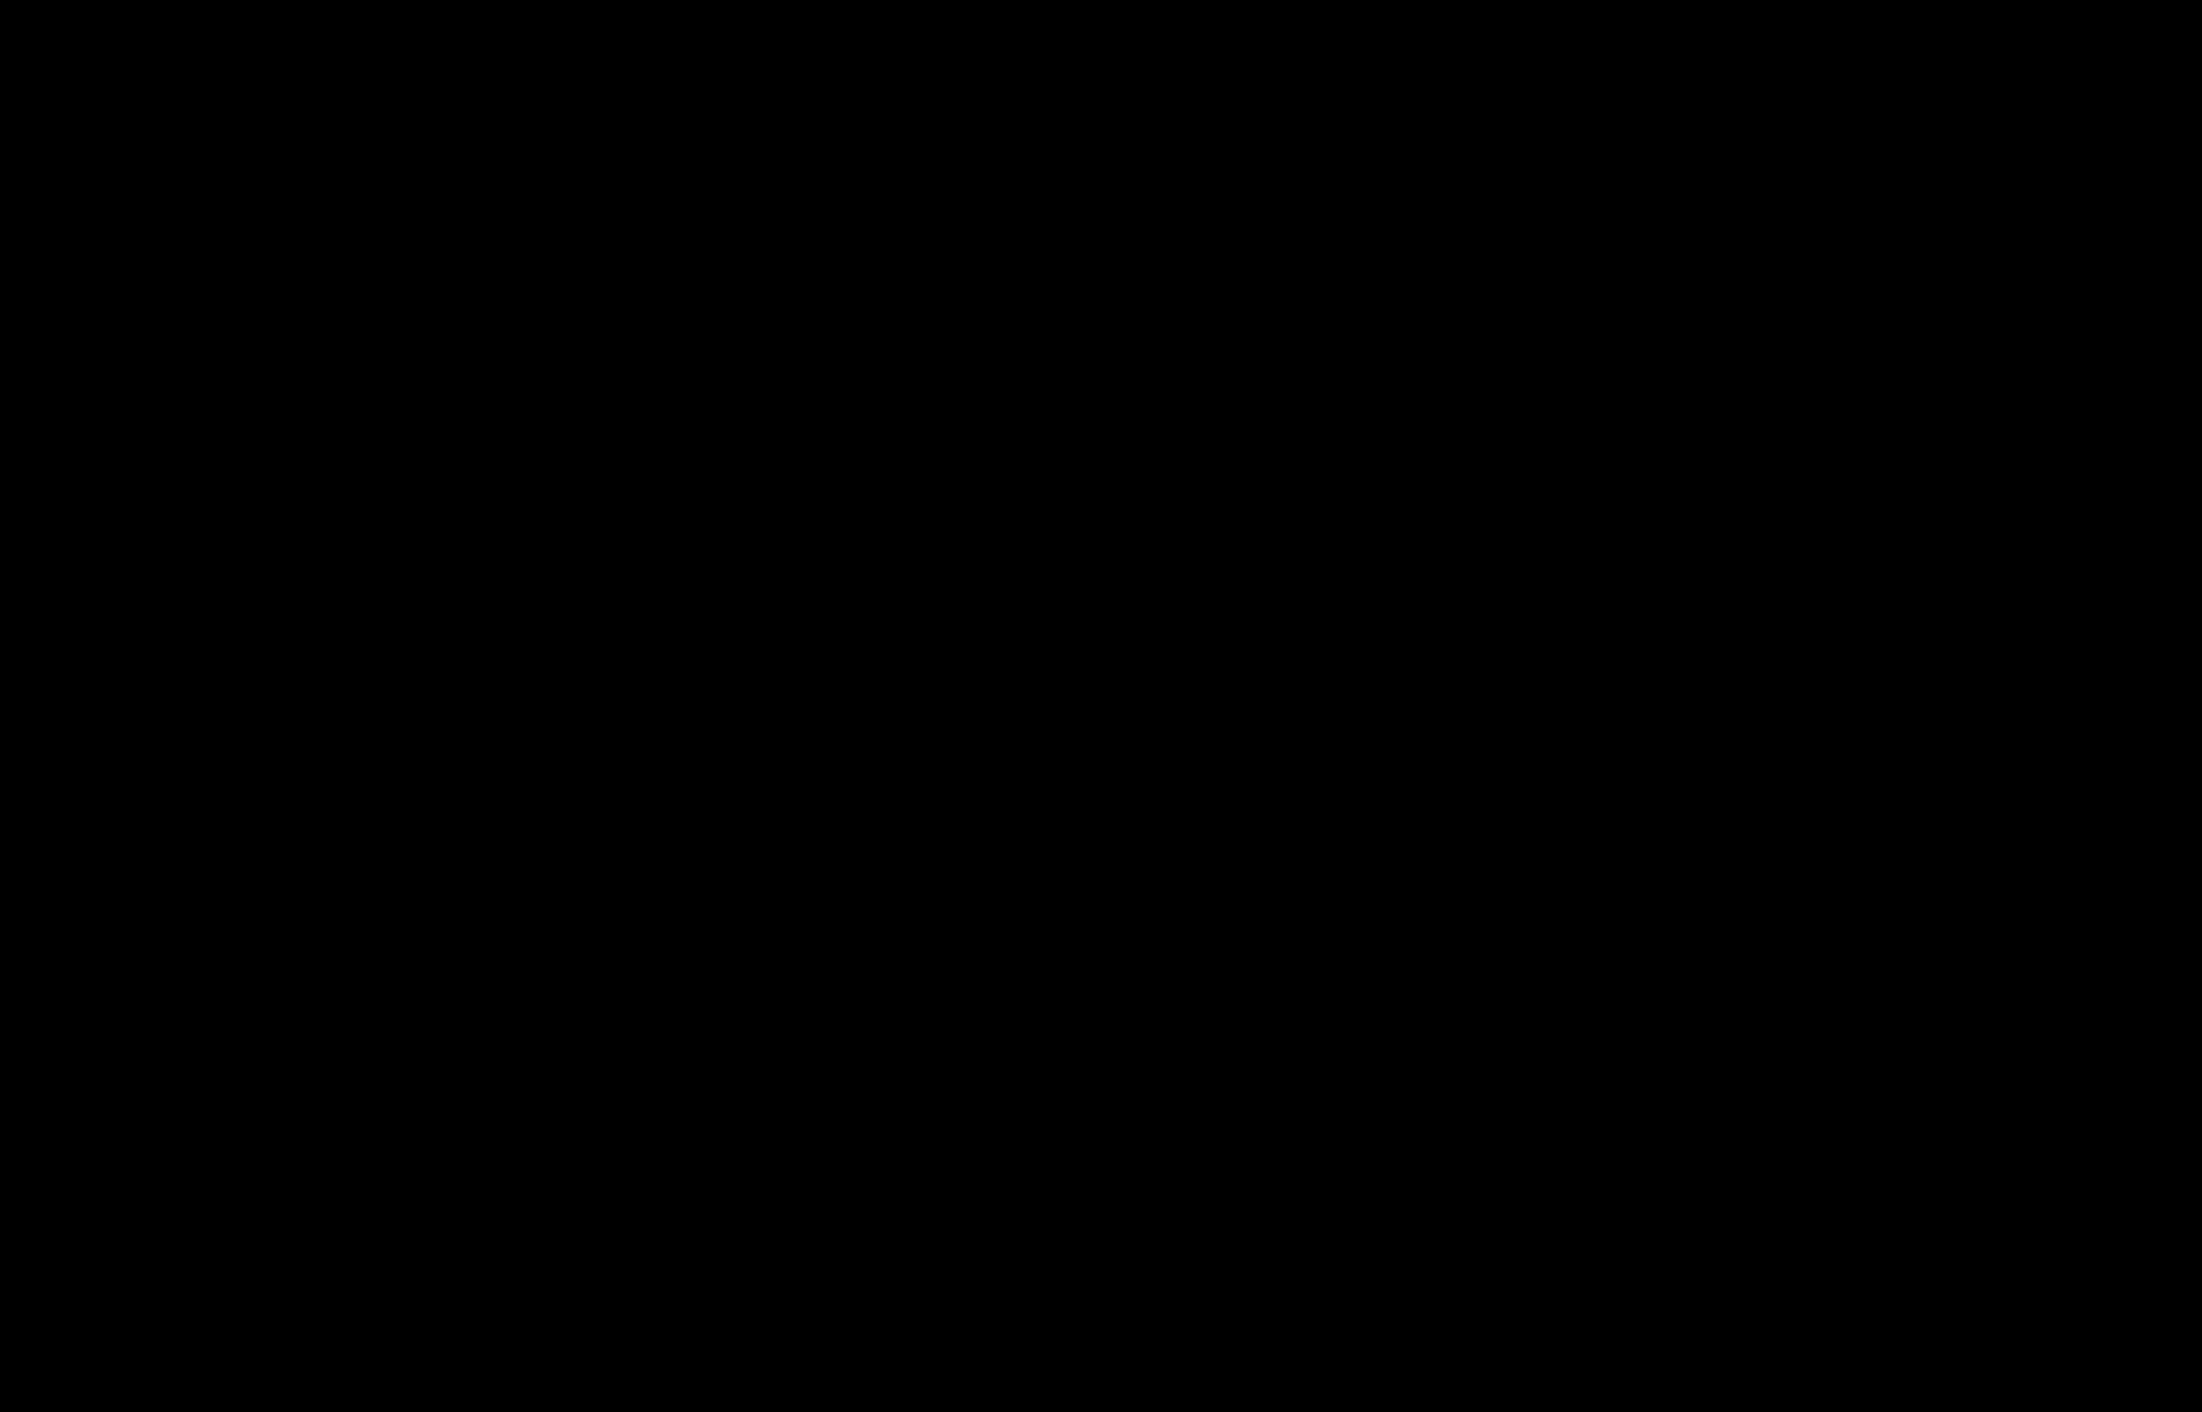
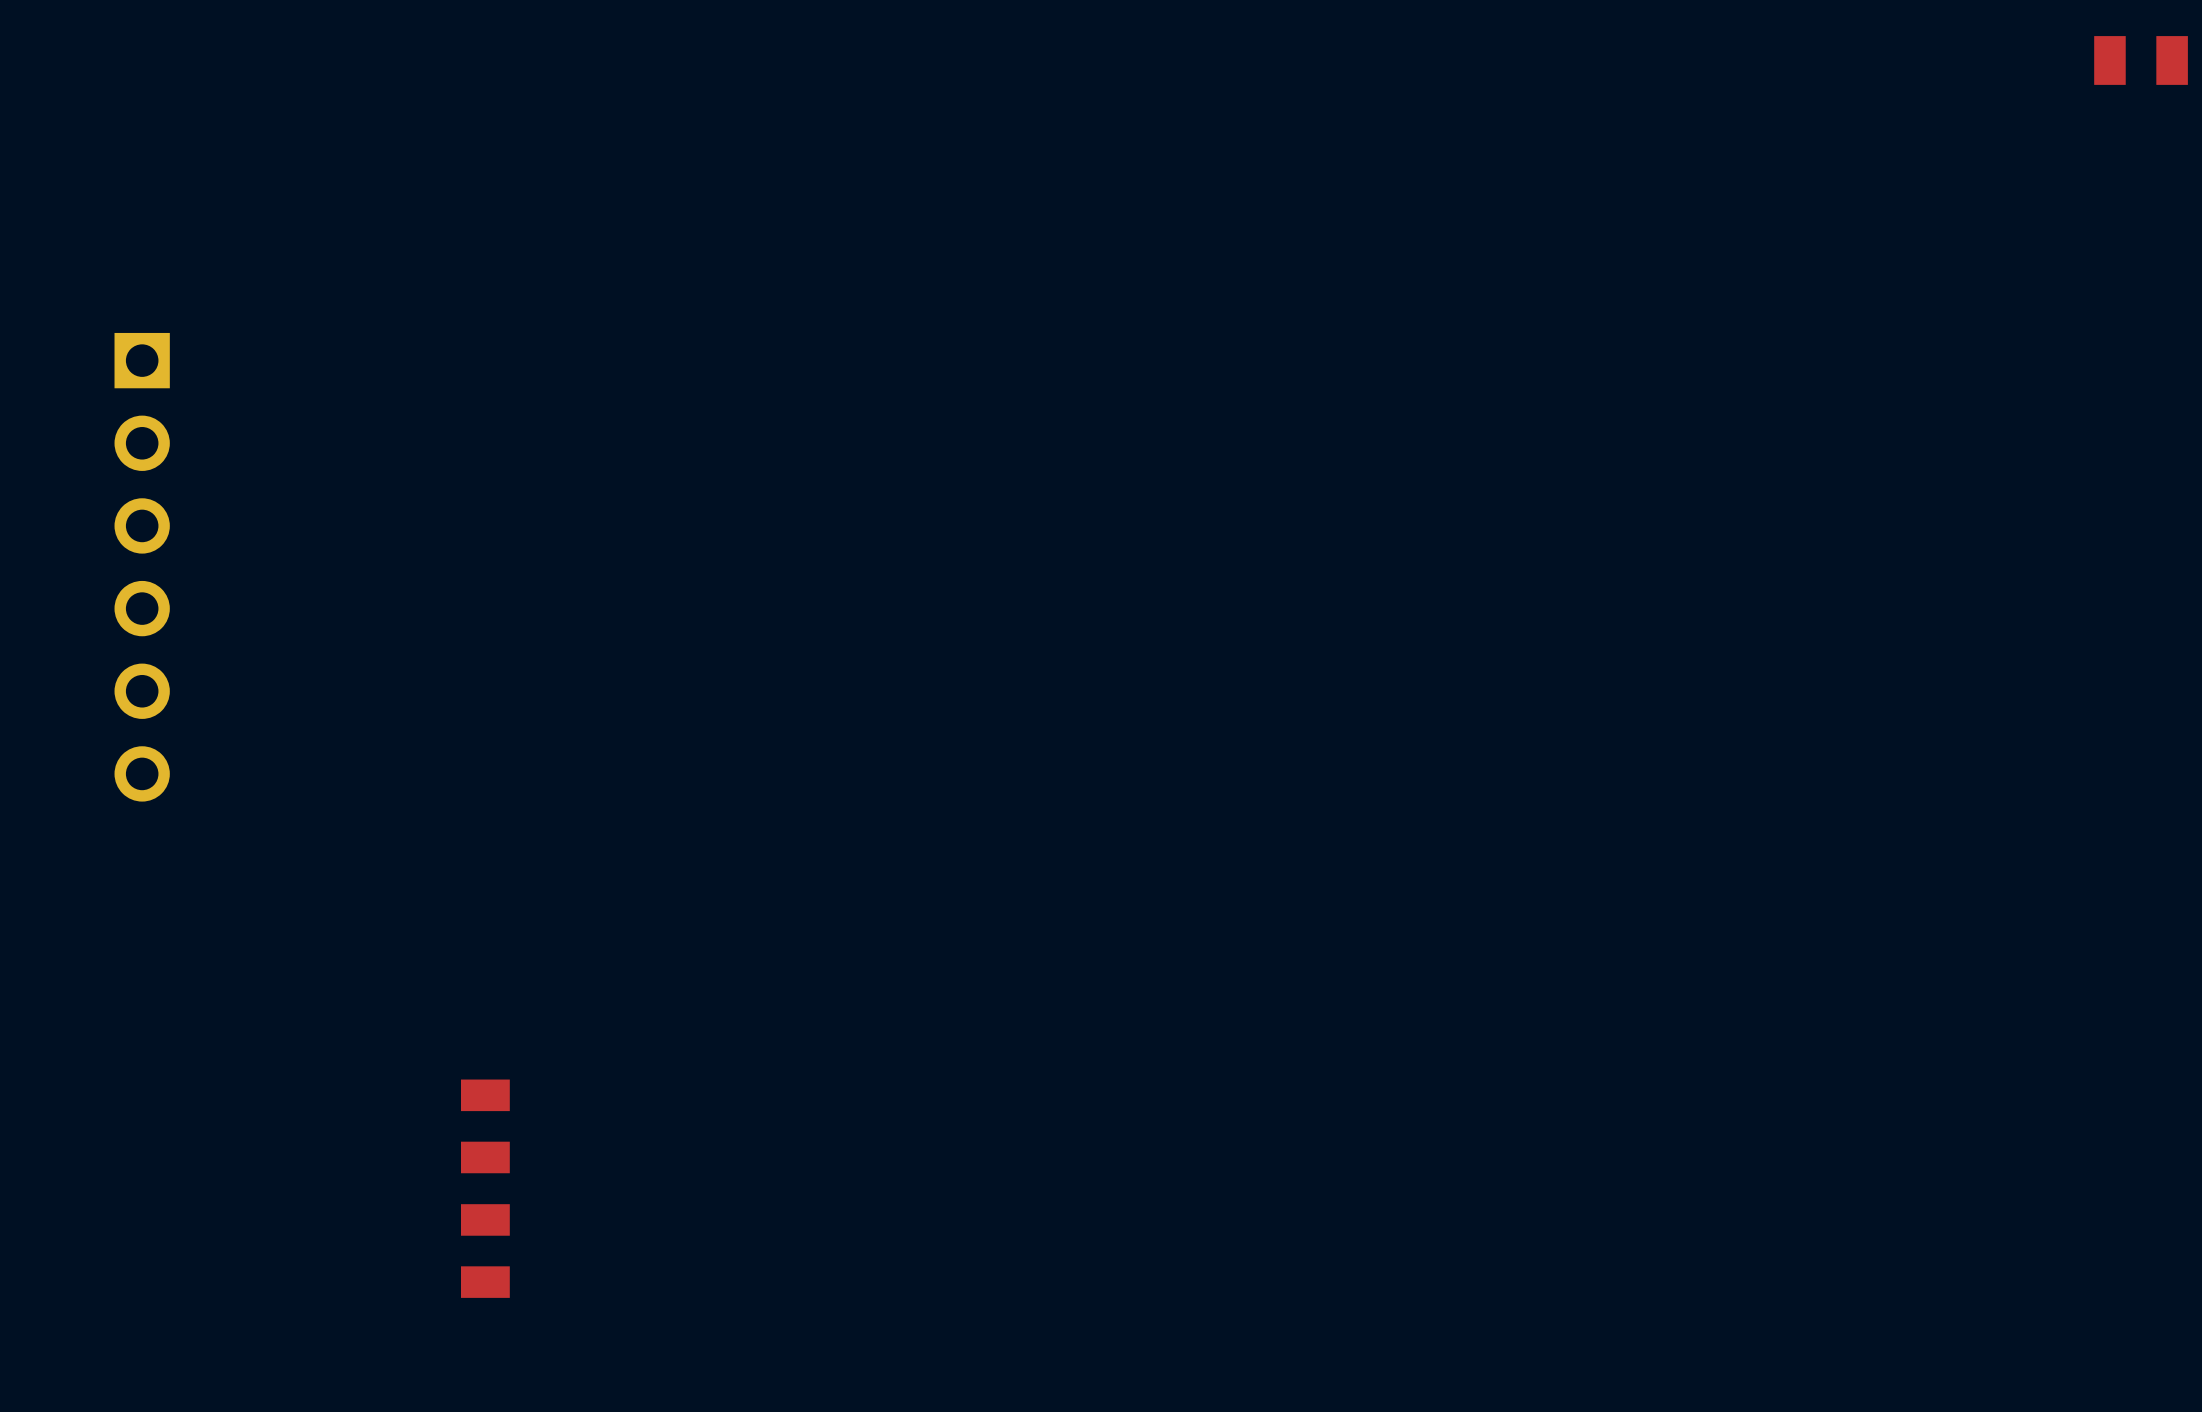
part: none -> (2141, 60)
part: none -> (142, 567)
part: none -> (485, 1126)
part: none -> (485, 1251)

